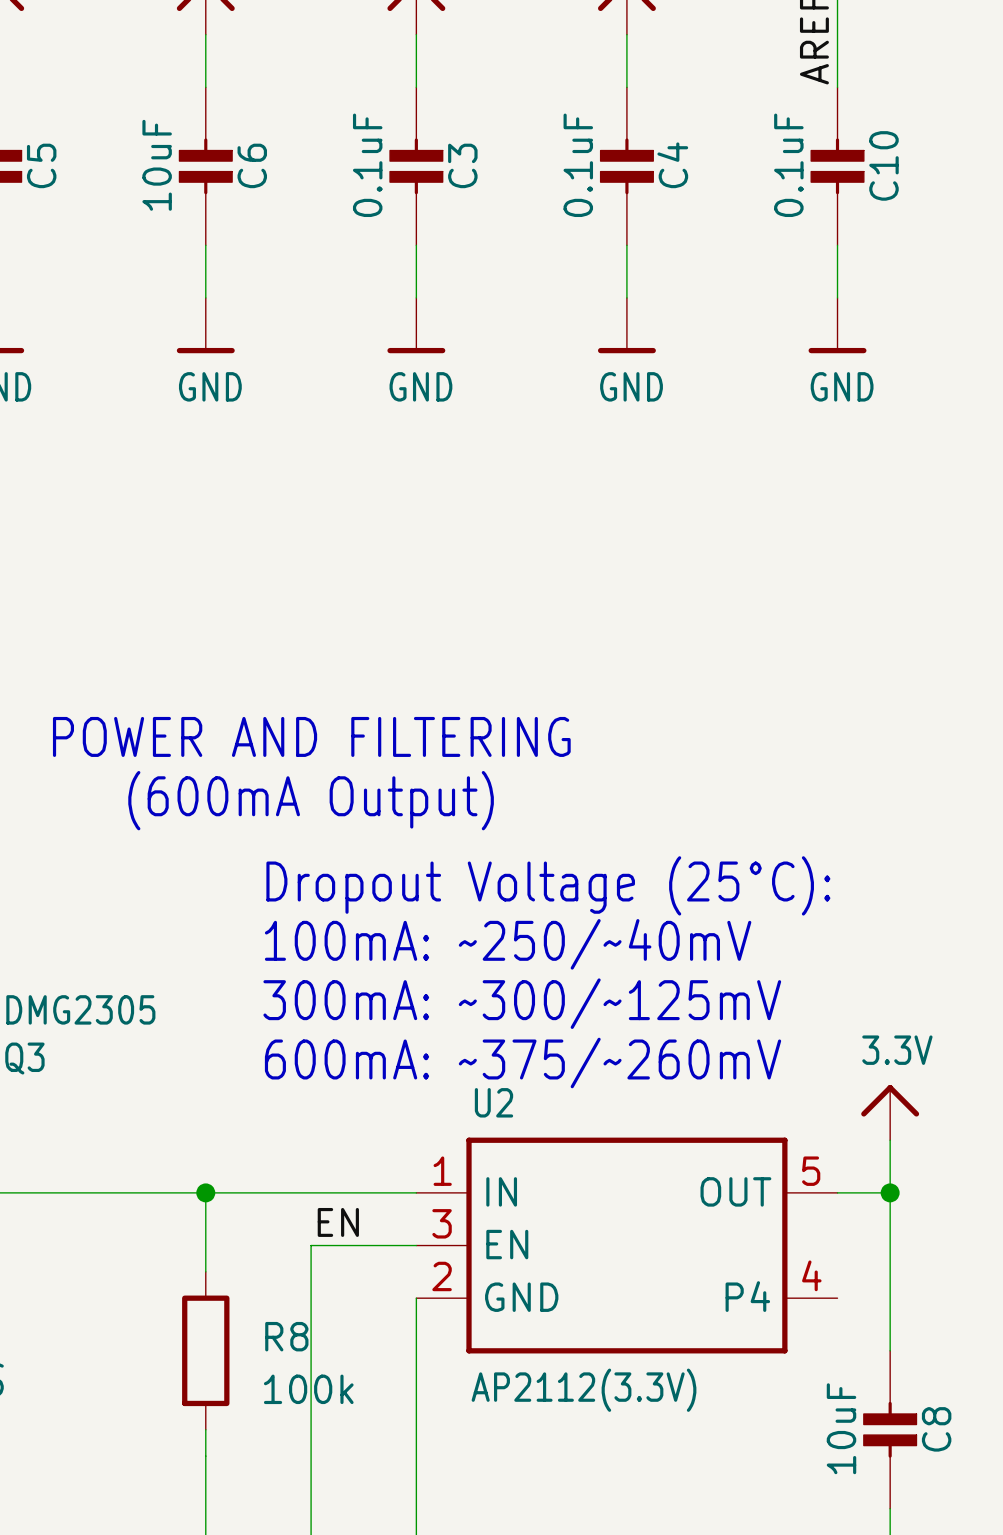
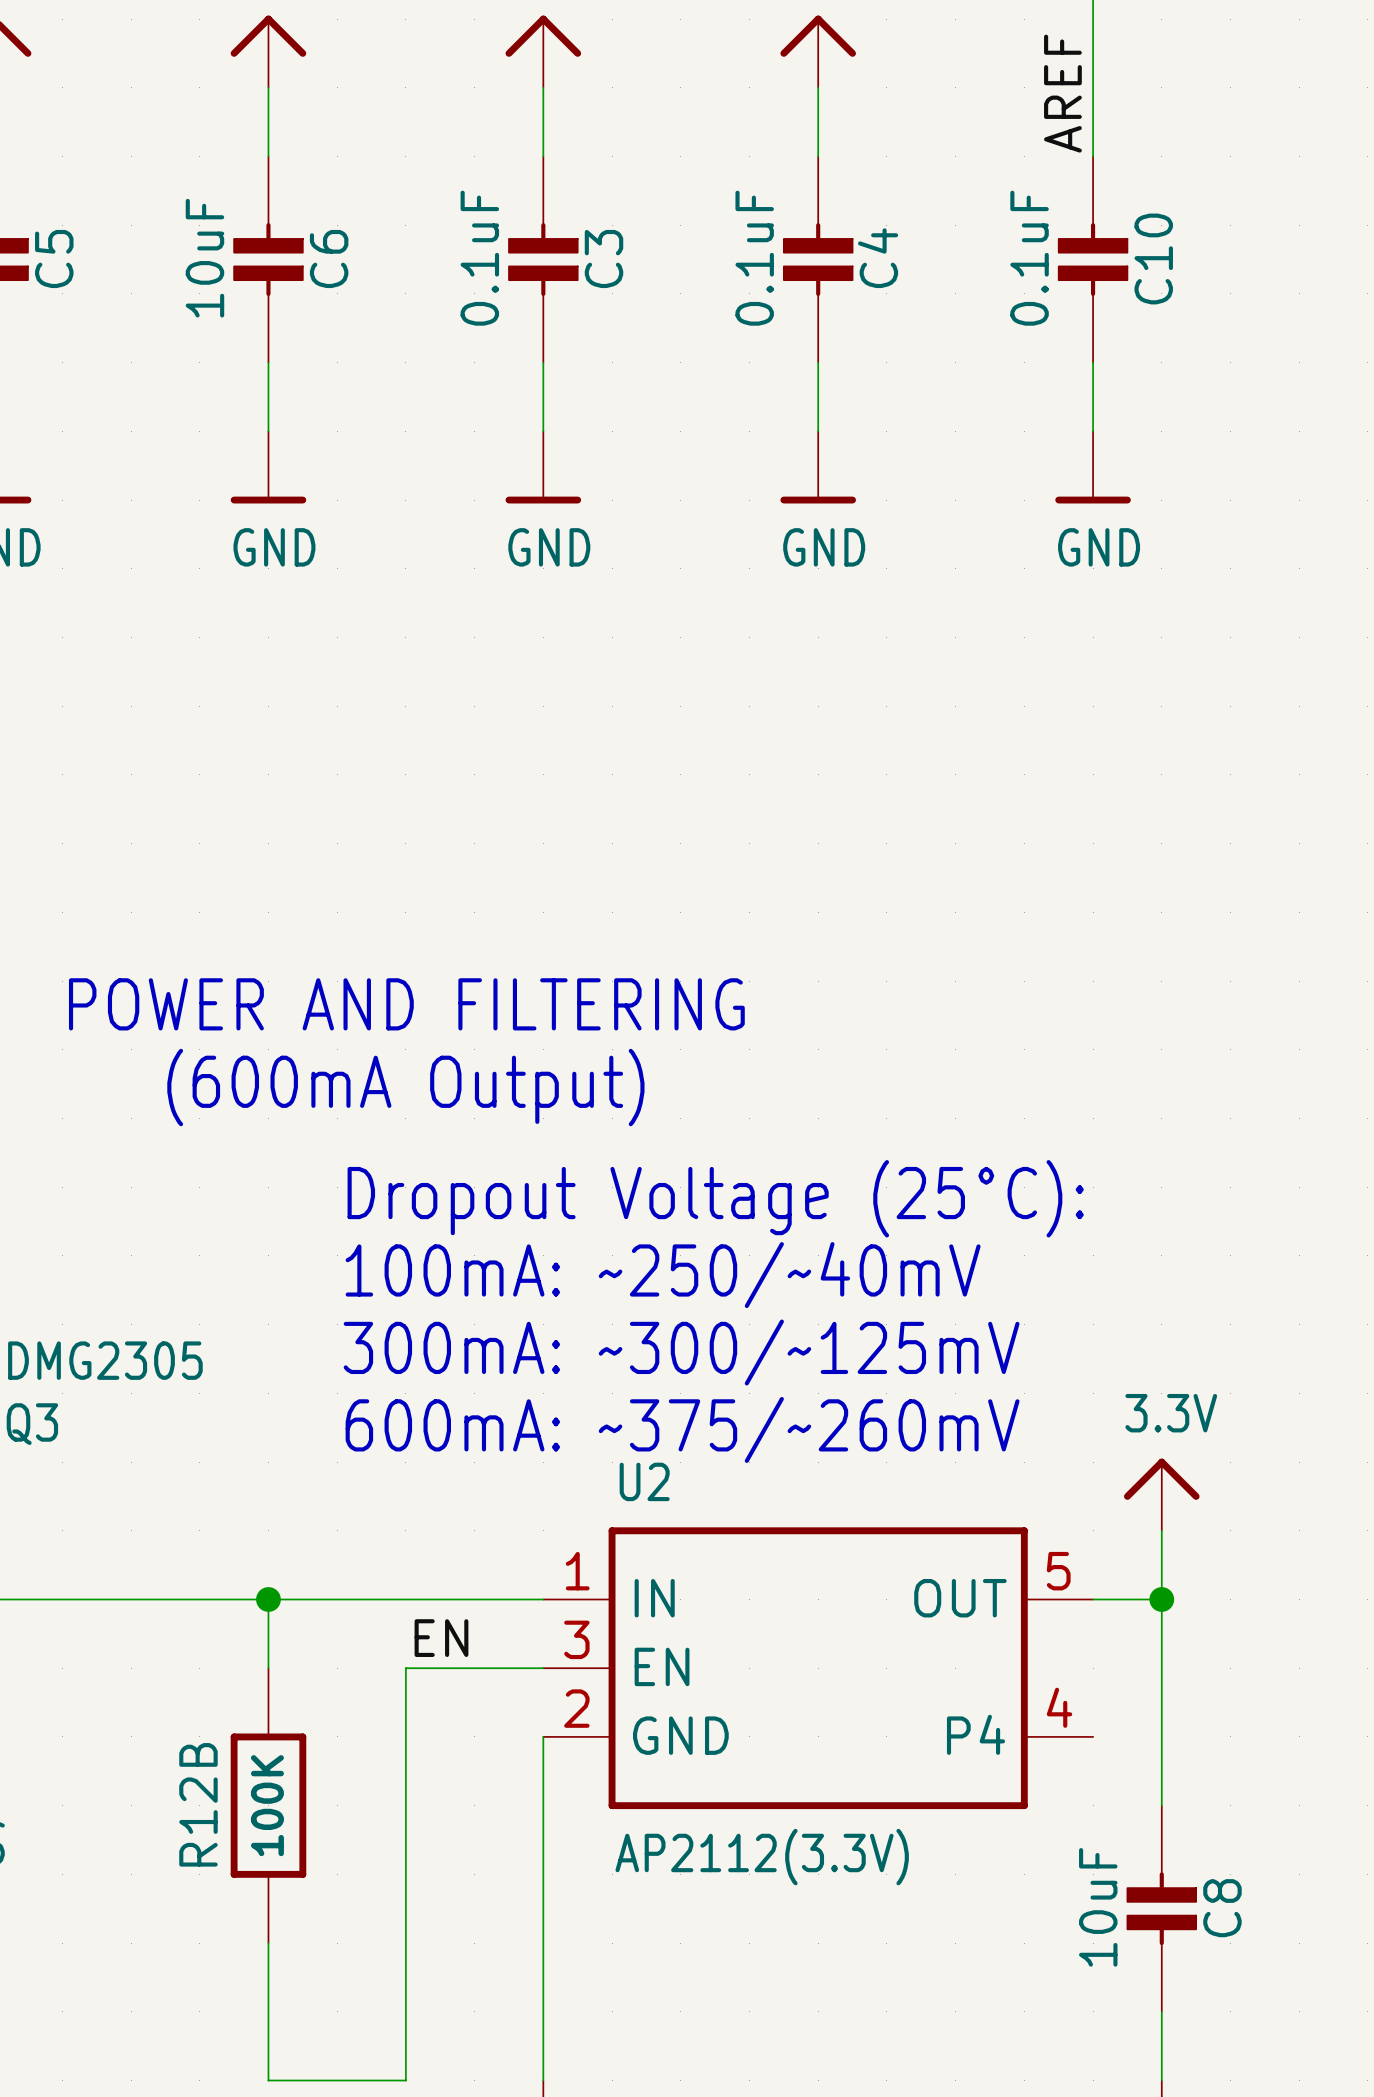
R8: 100k (205, 1350) -> none
R12B: none -> 100K (268, 1805)

